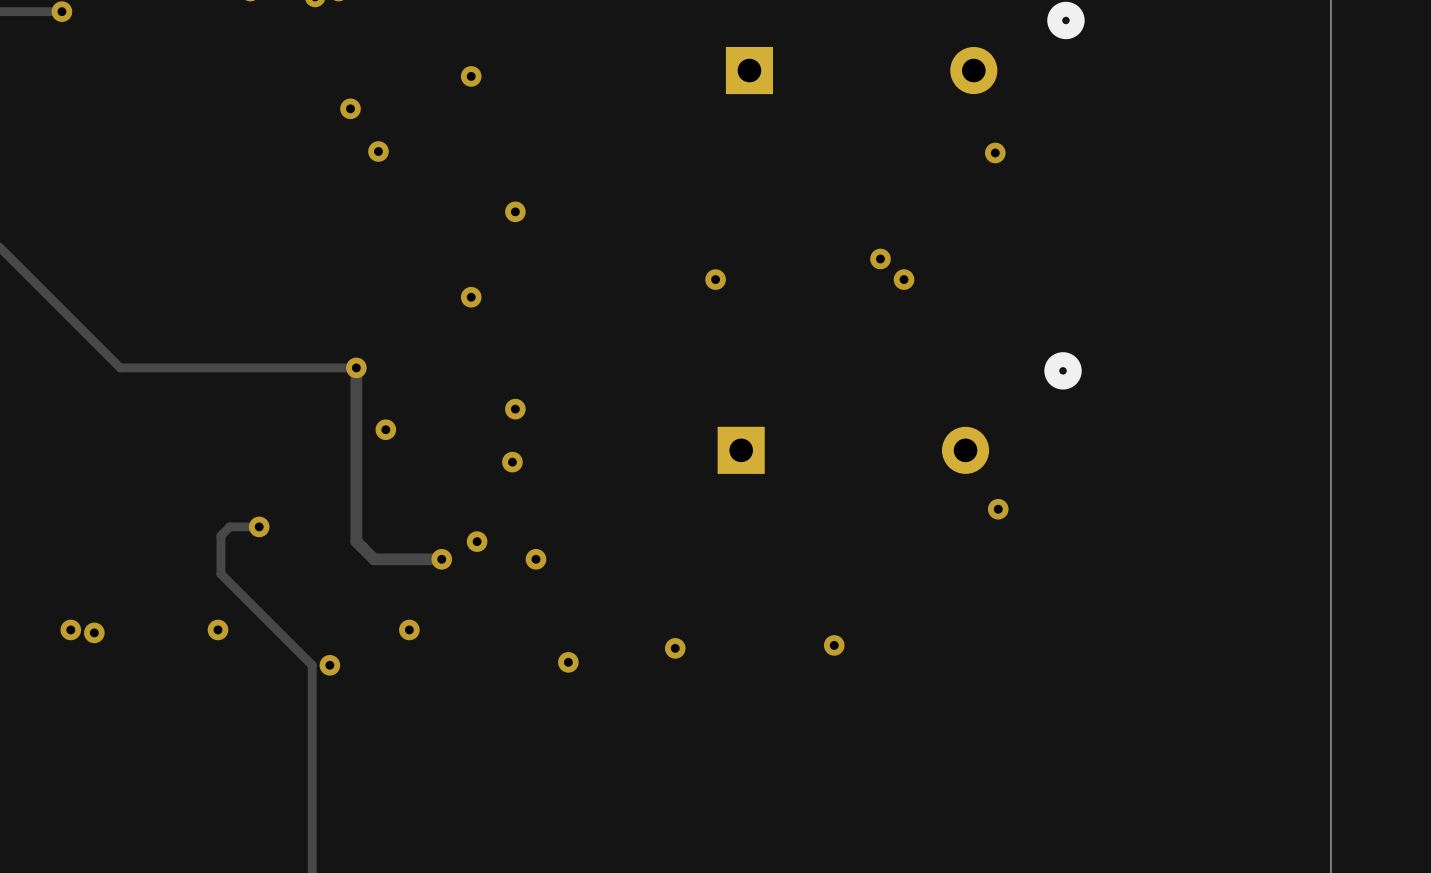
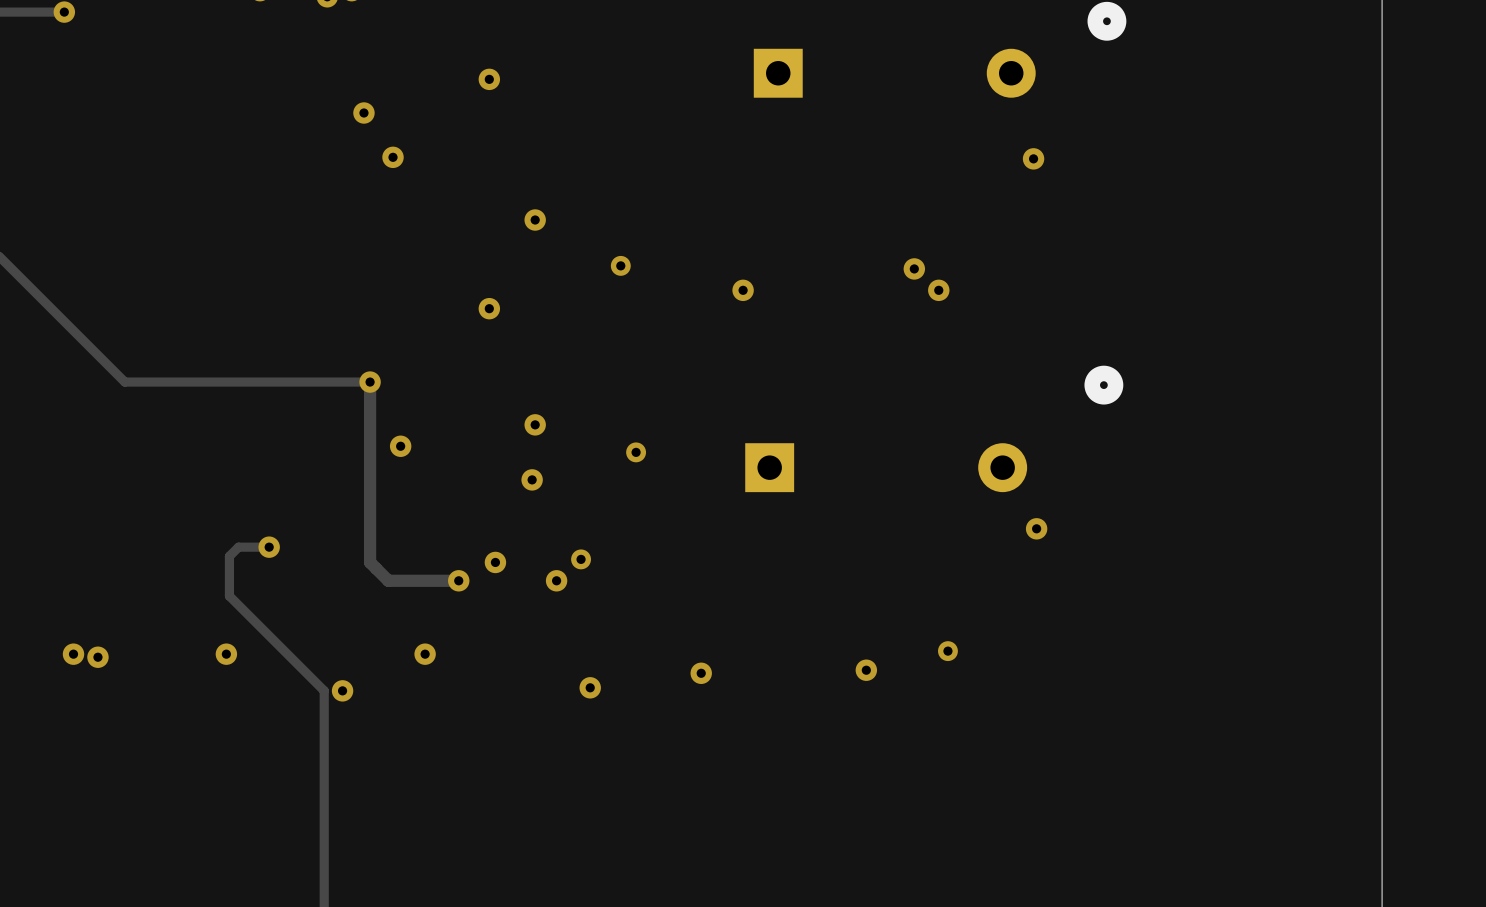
via: none -> (620, 265)
via: none -> (636, 452)
via: none -> (581, 559)
via: none -> (947, 651)

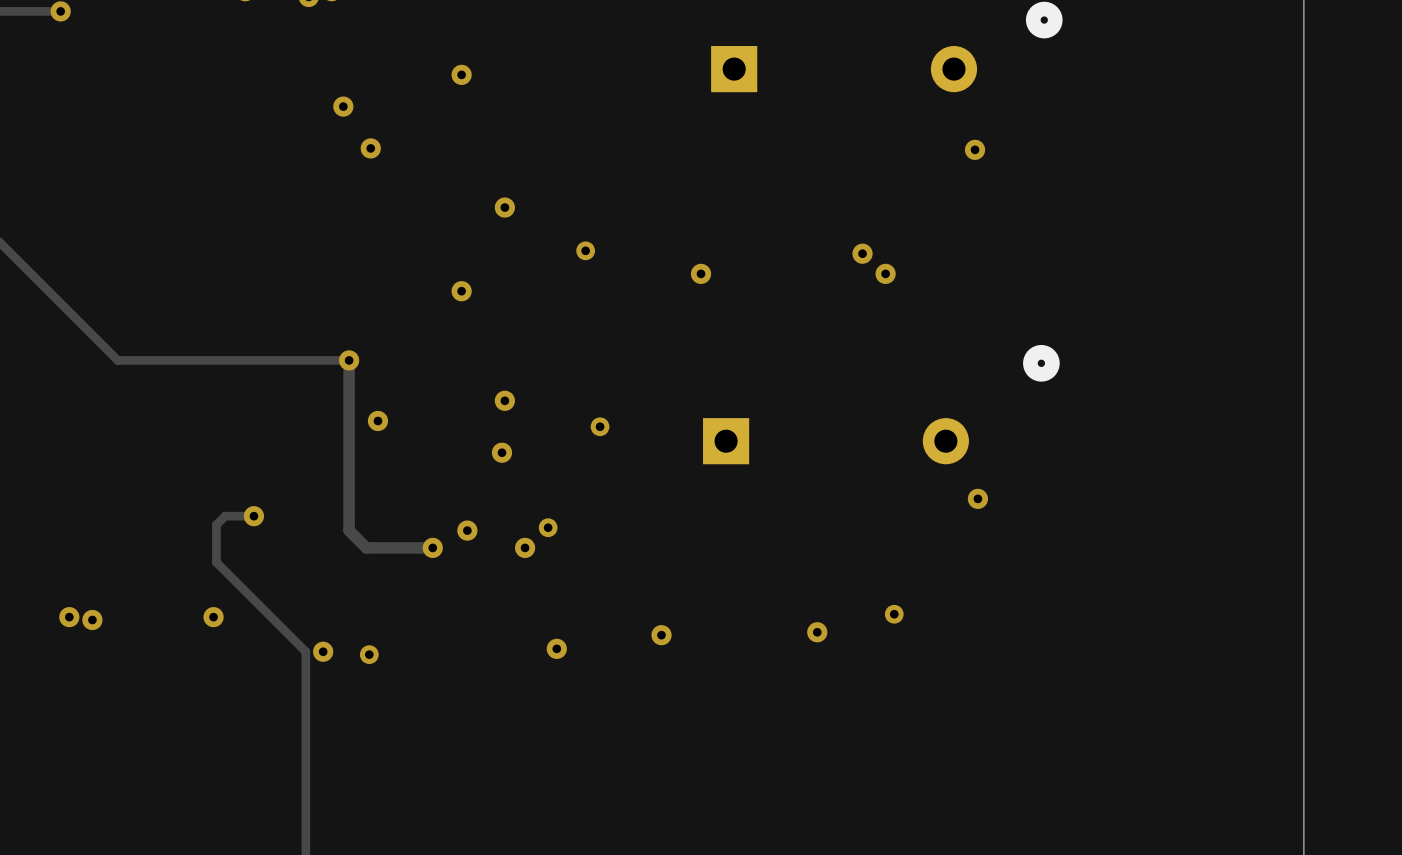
via: (425, 654) -> none
via: none -> (369, 654)

